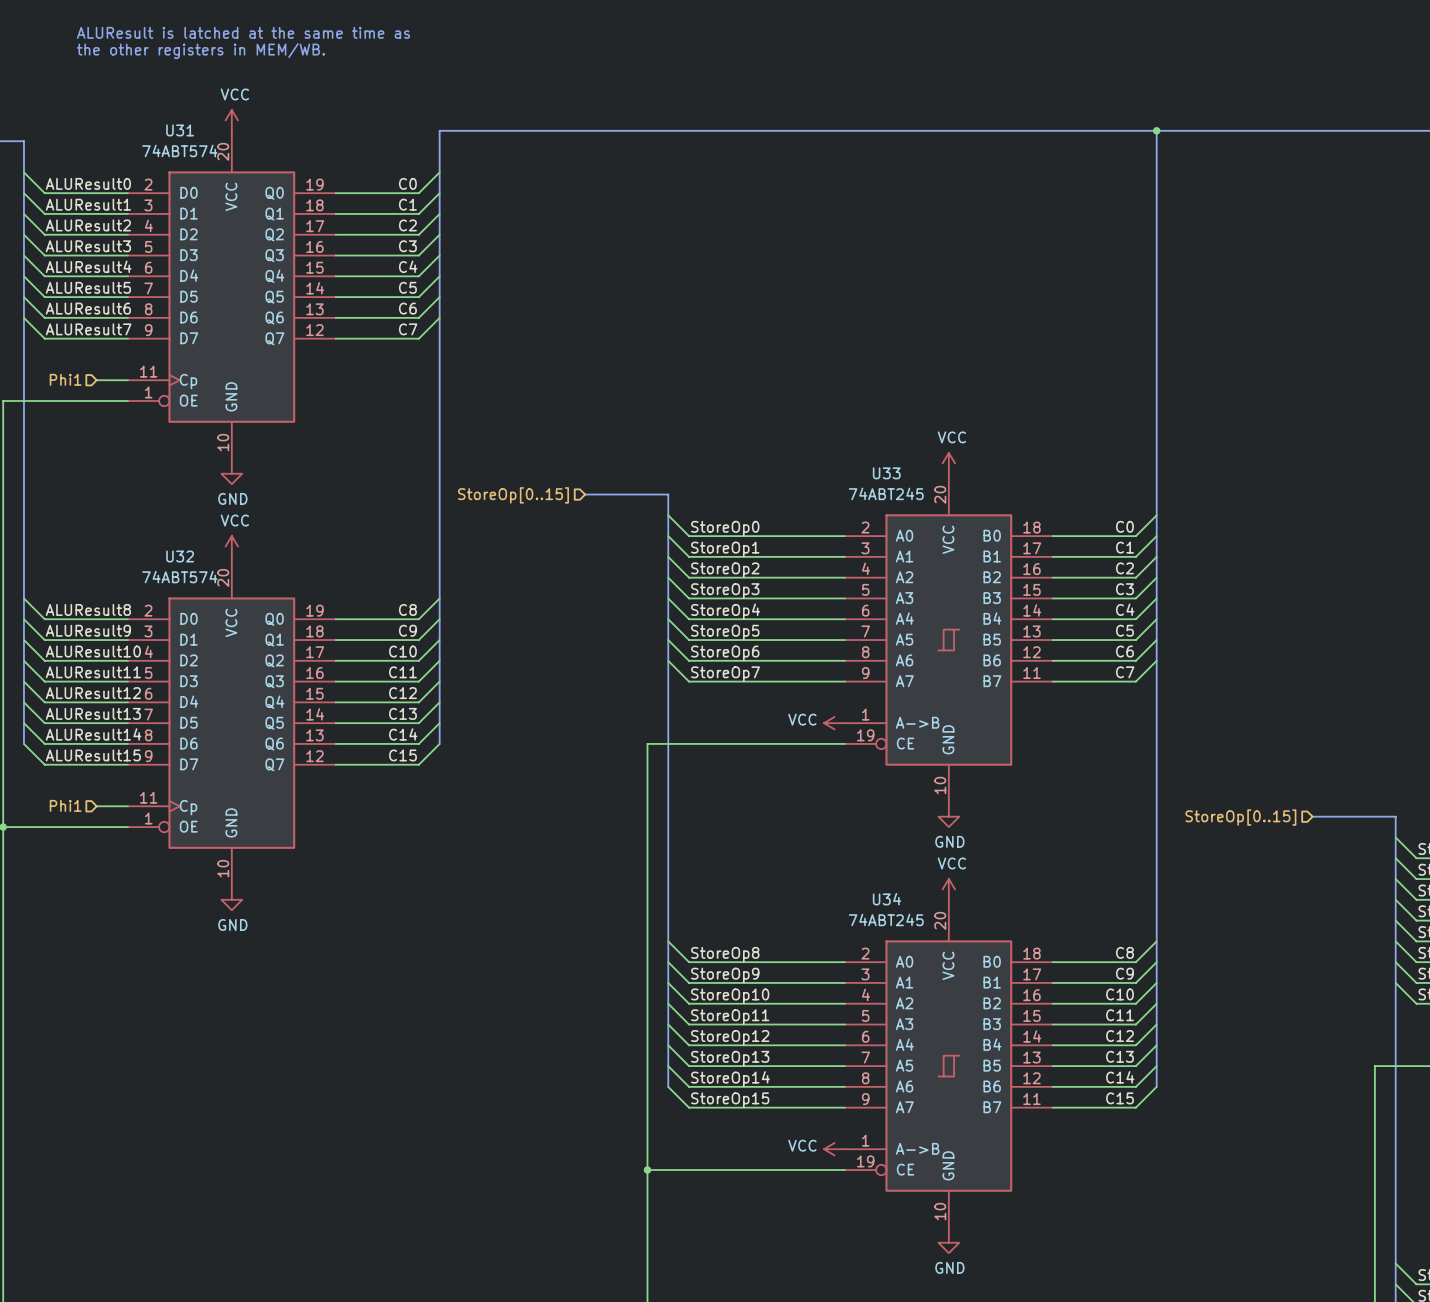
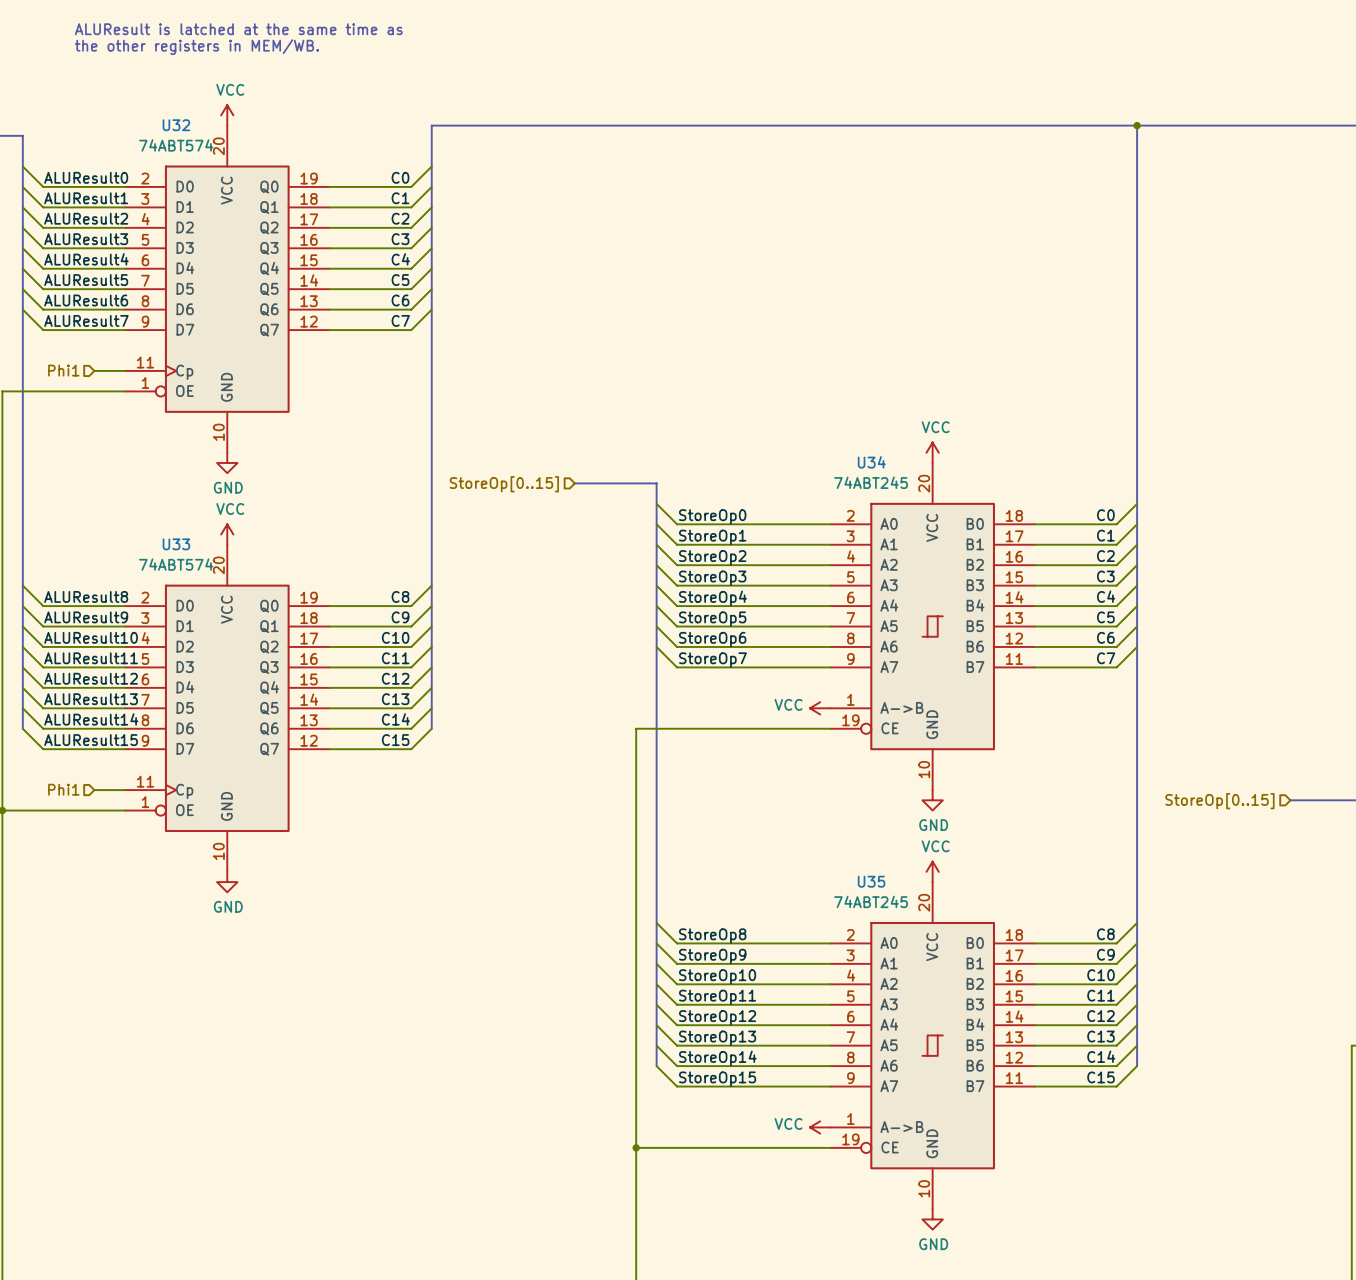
U31 name: U31 (180, 130) -> U32 (176, 125)
U33 name: U33 (886, 473) -> U34 (871, 462)
U32 name: U32 (180, 556) -> U33 (176, 544)
U34 name: U34 (886, 899) -> U35 (871, 881)

